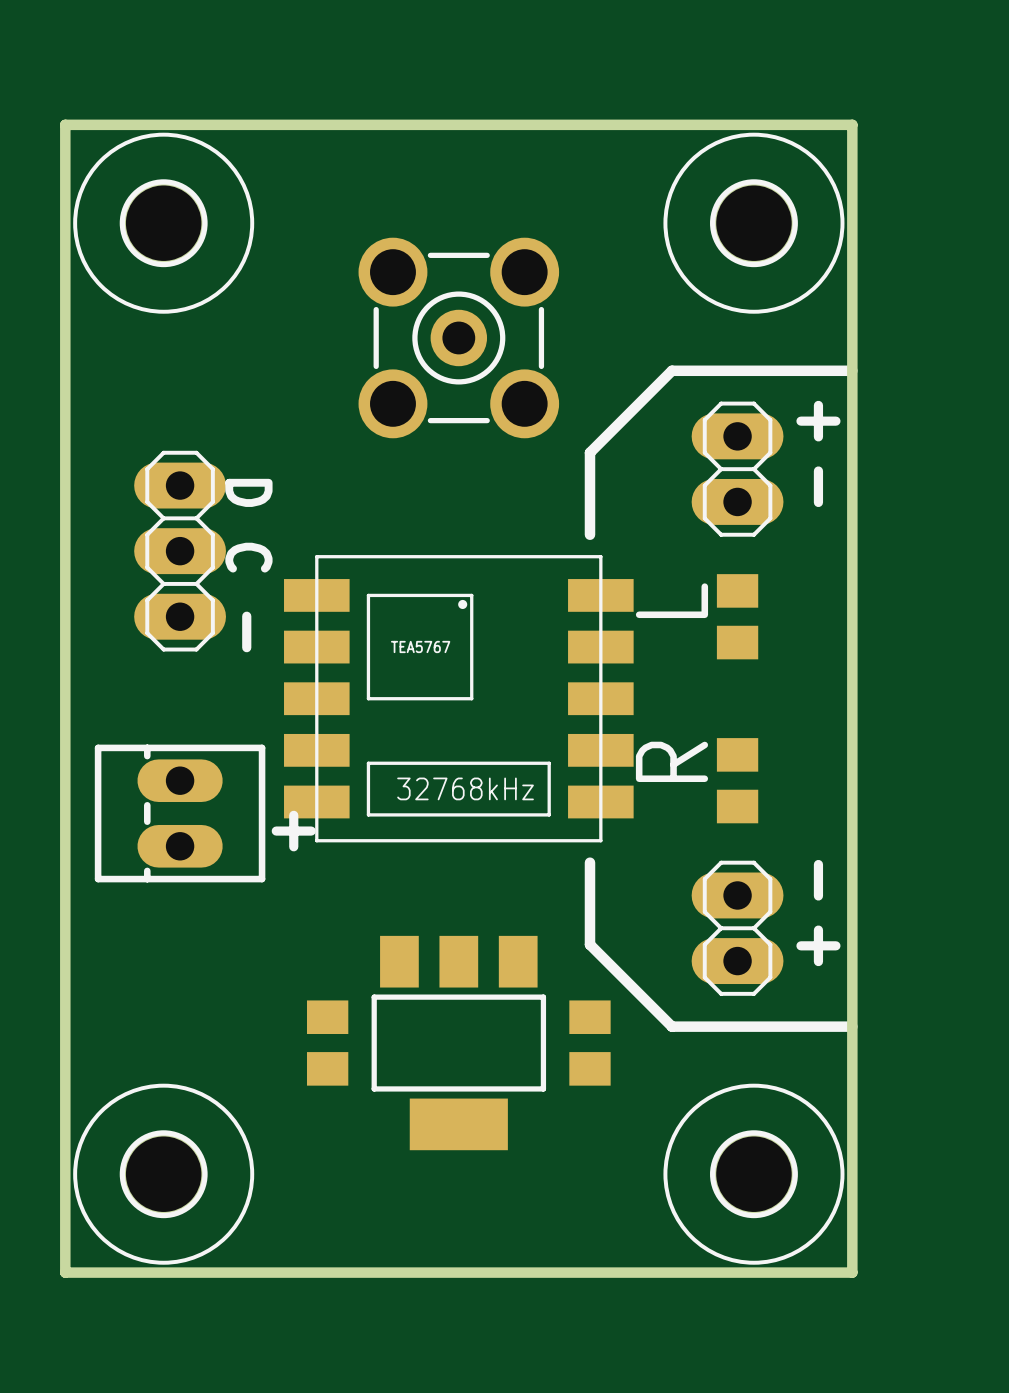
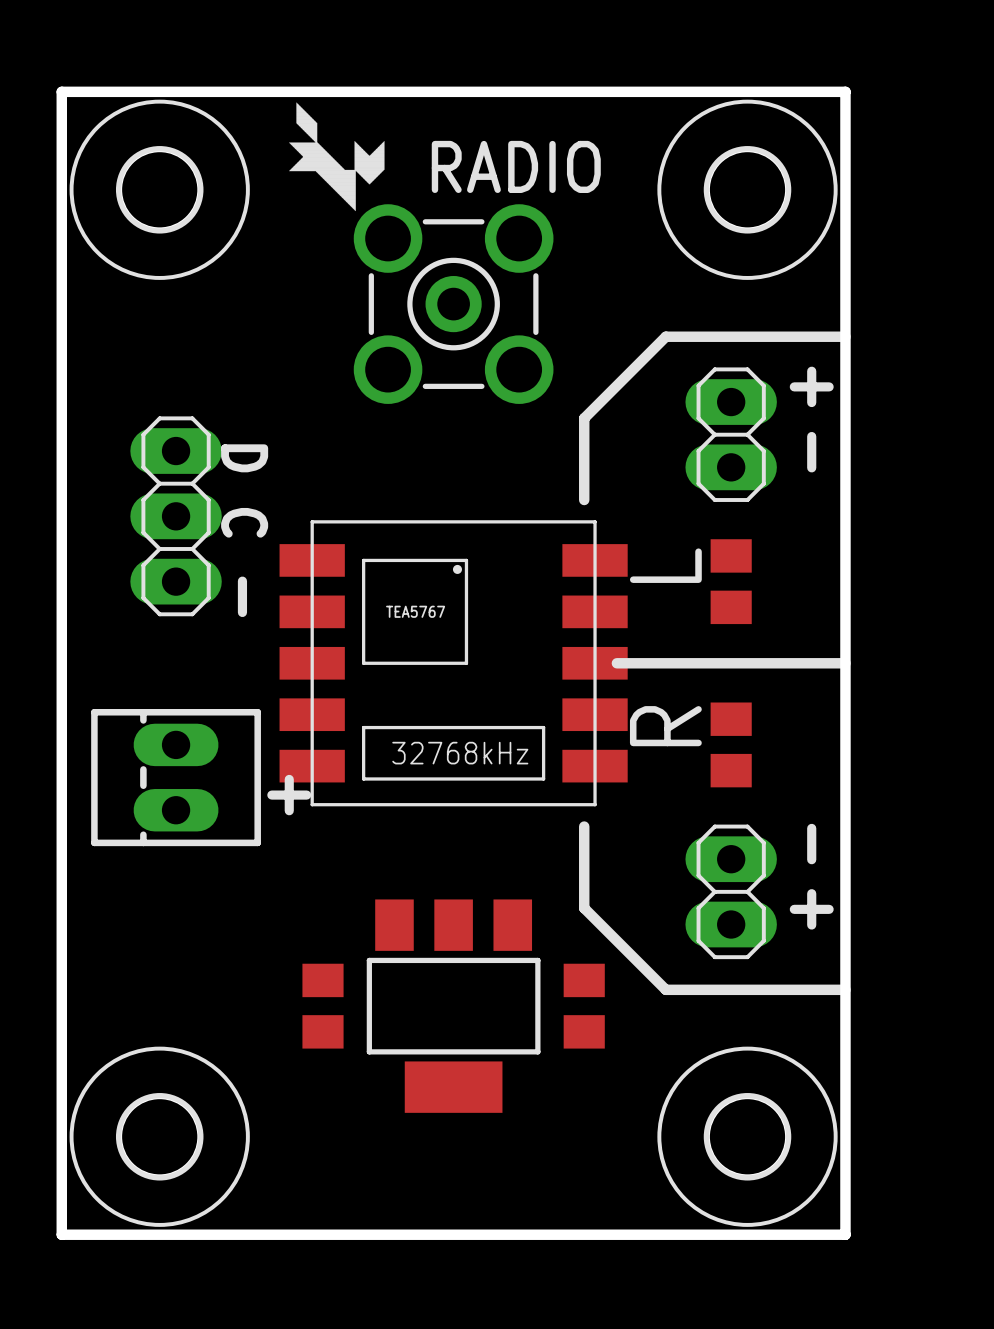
drawing: none -> [289, 102, 385, 212]
text: none -> RADIO (516, 166)
line: none -> (616, 663) (845, 663)

